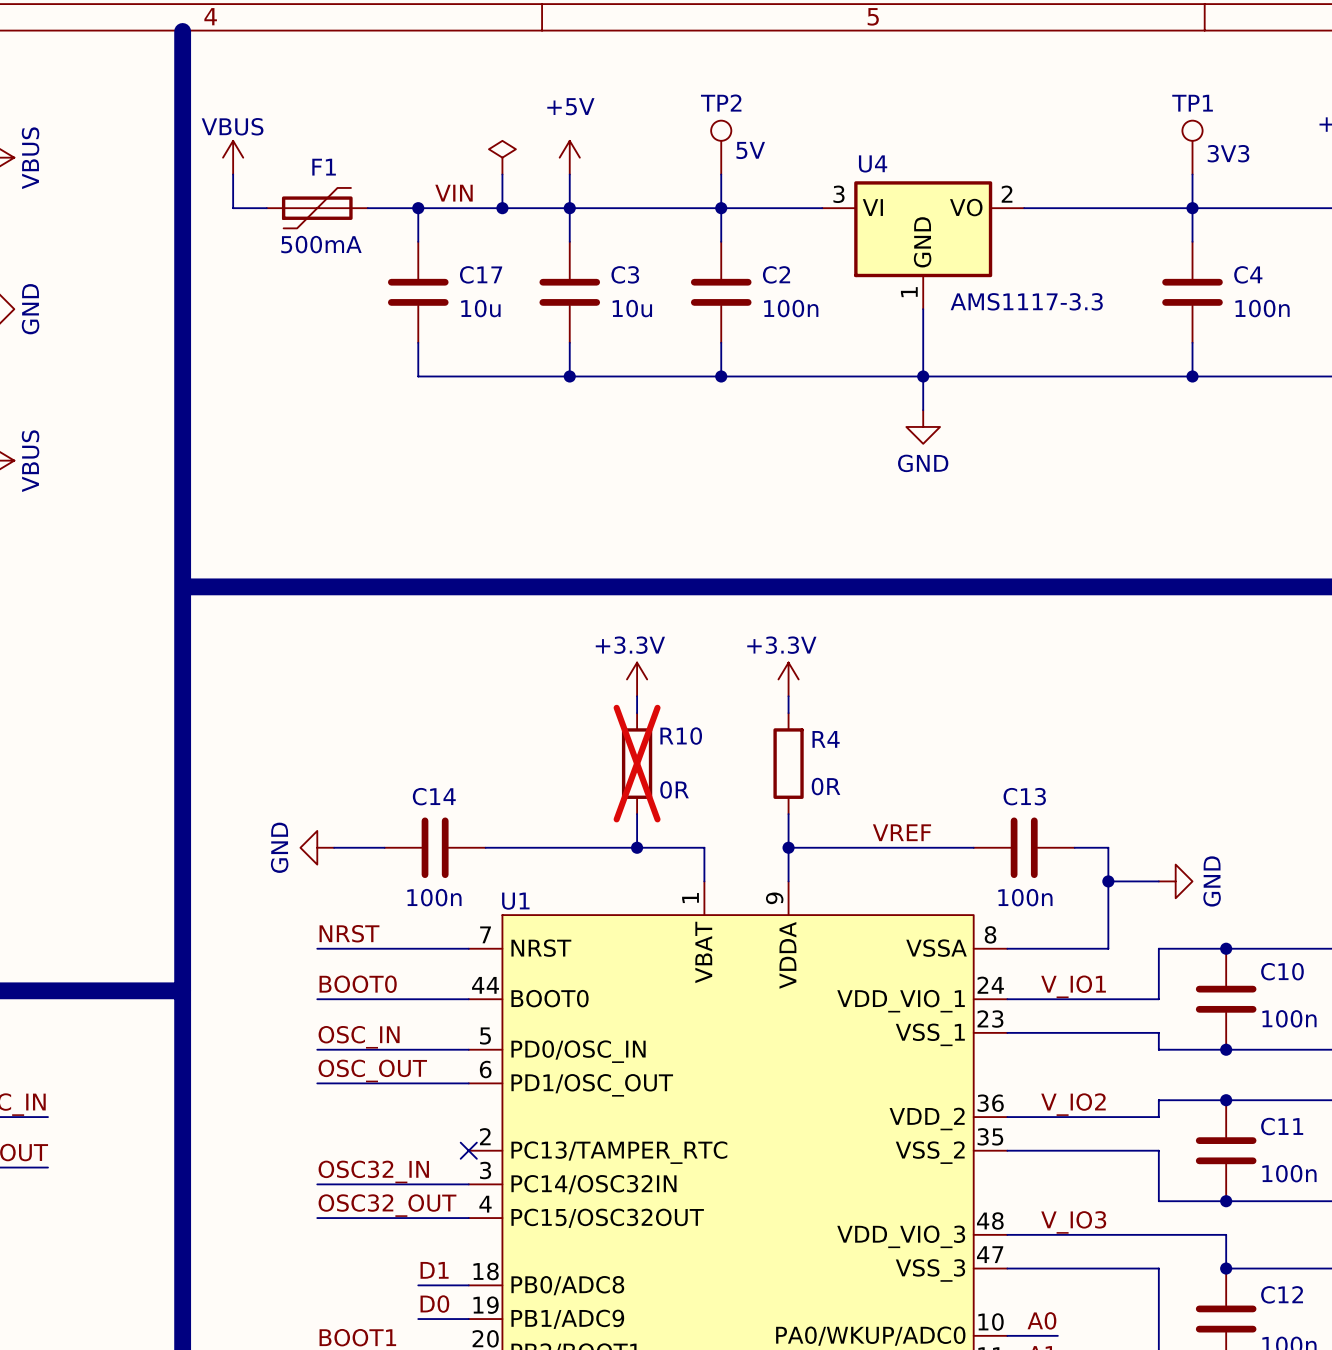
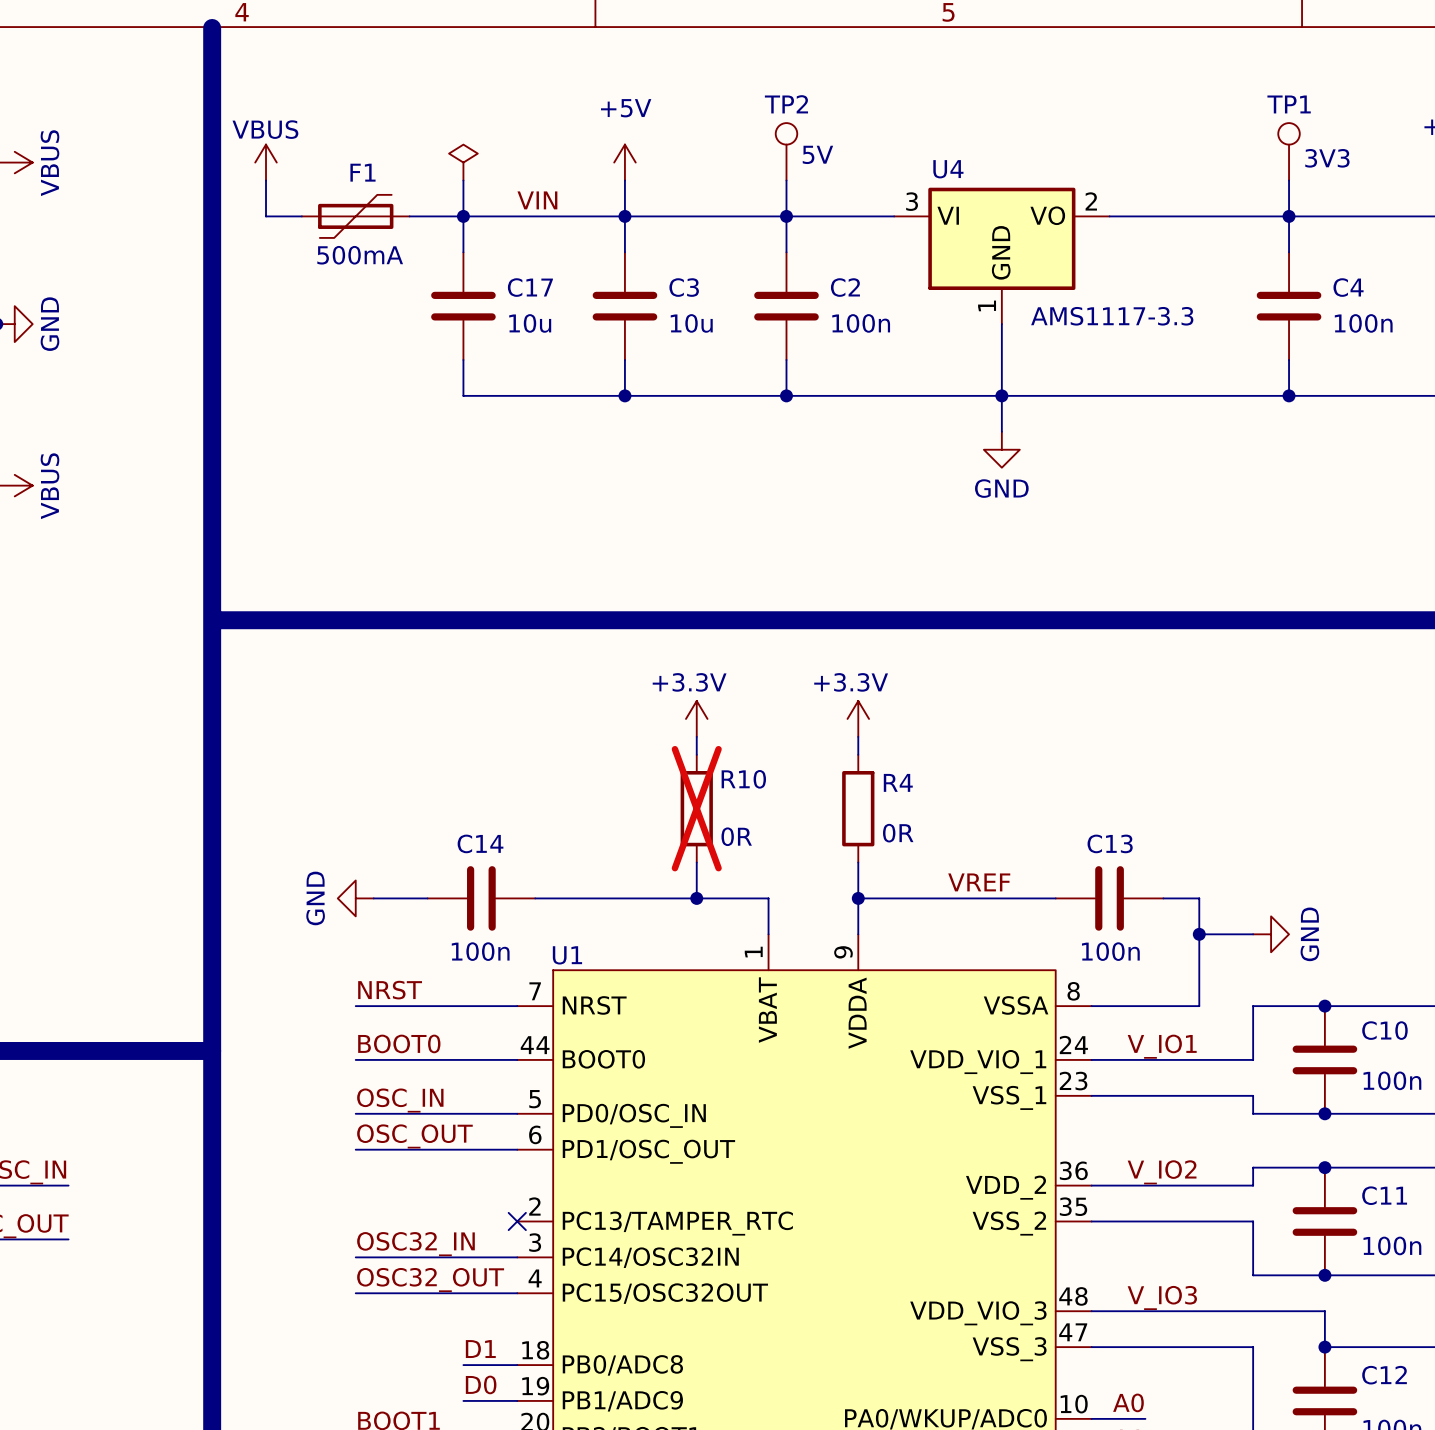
power symbol position: (502, 157) -> (463, 162)
wire: (502, 174) (502, 208) -> (463, 180) (463, 216)
label position: VIN (454, 193) -> VIN (537, 200)
junction: (502, 208) -> none

